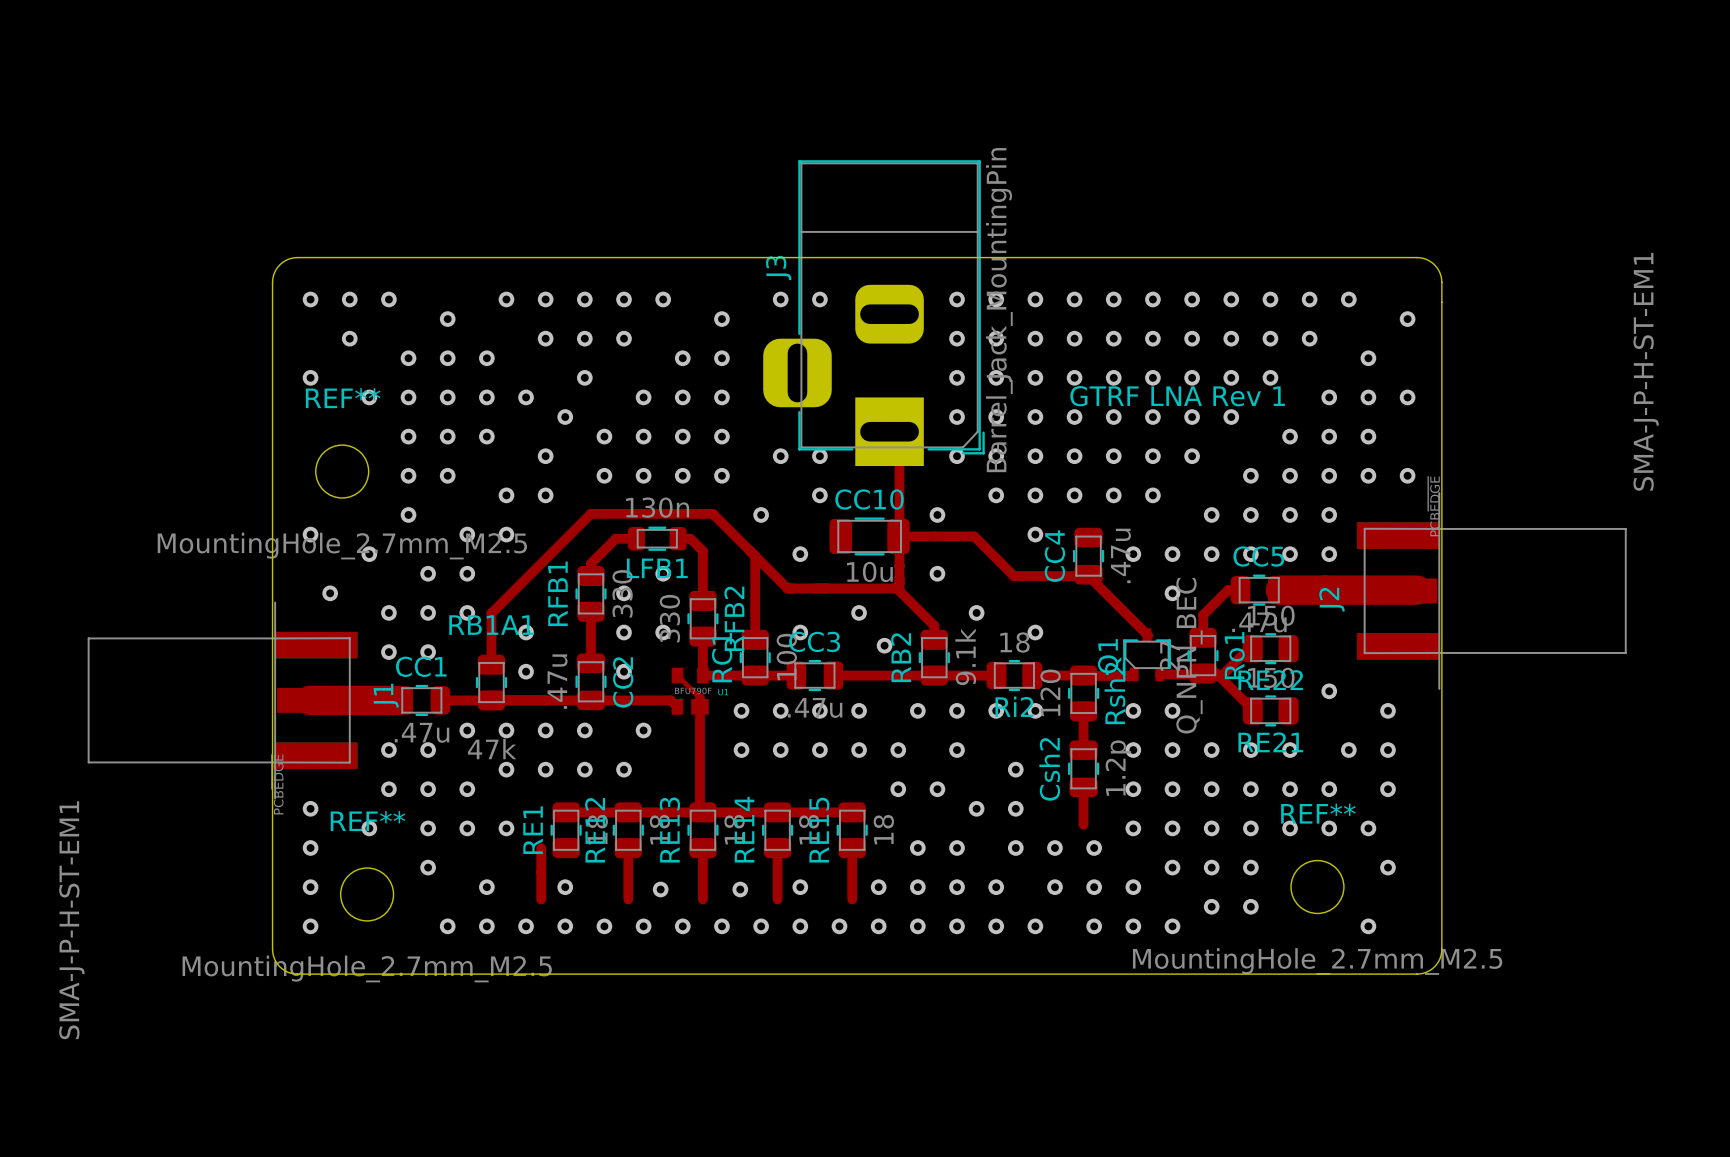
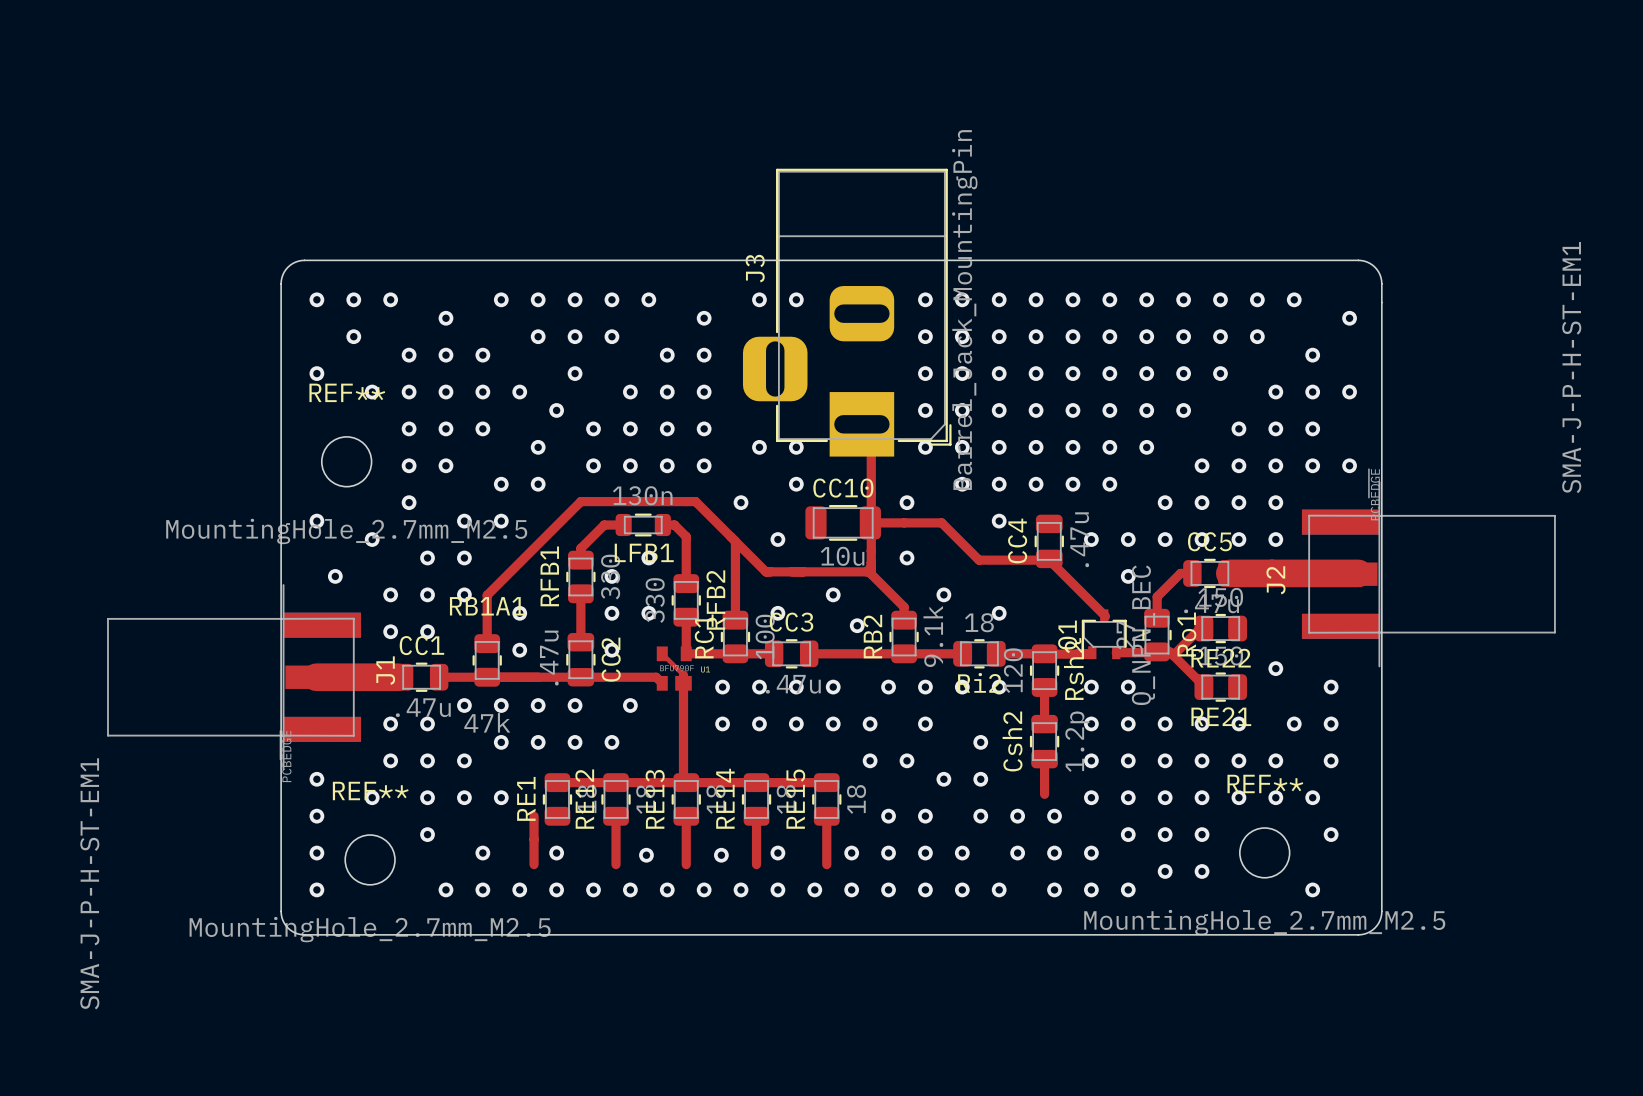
text: GTRF LNA Rev 1 (1177, 396) -> none

